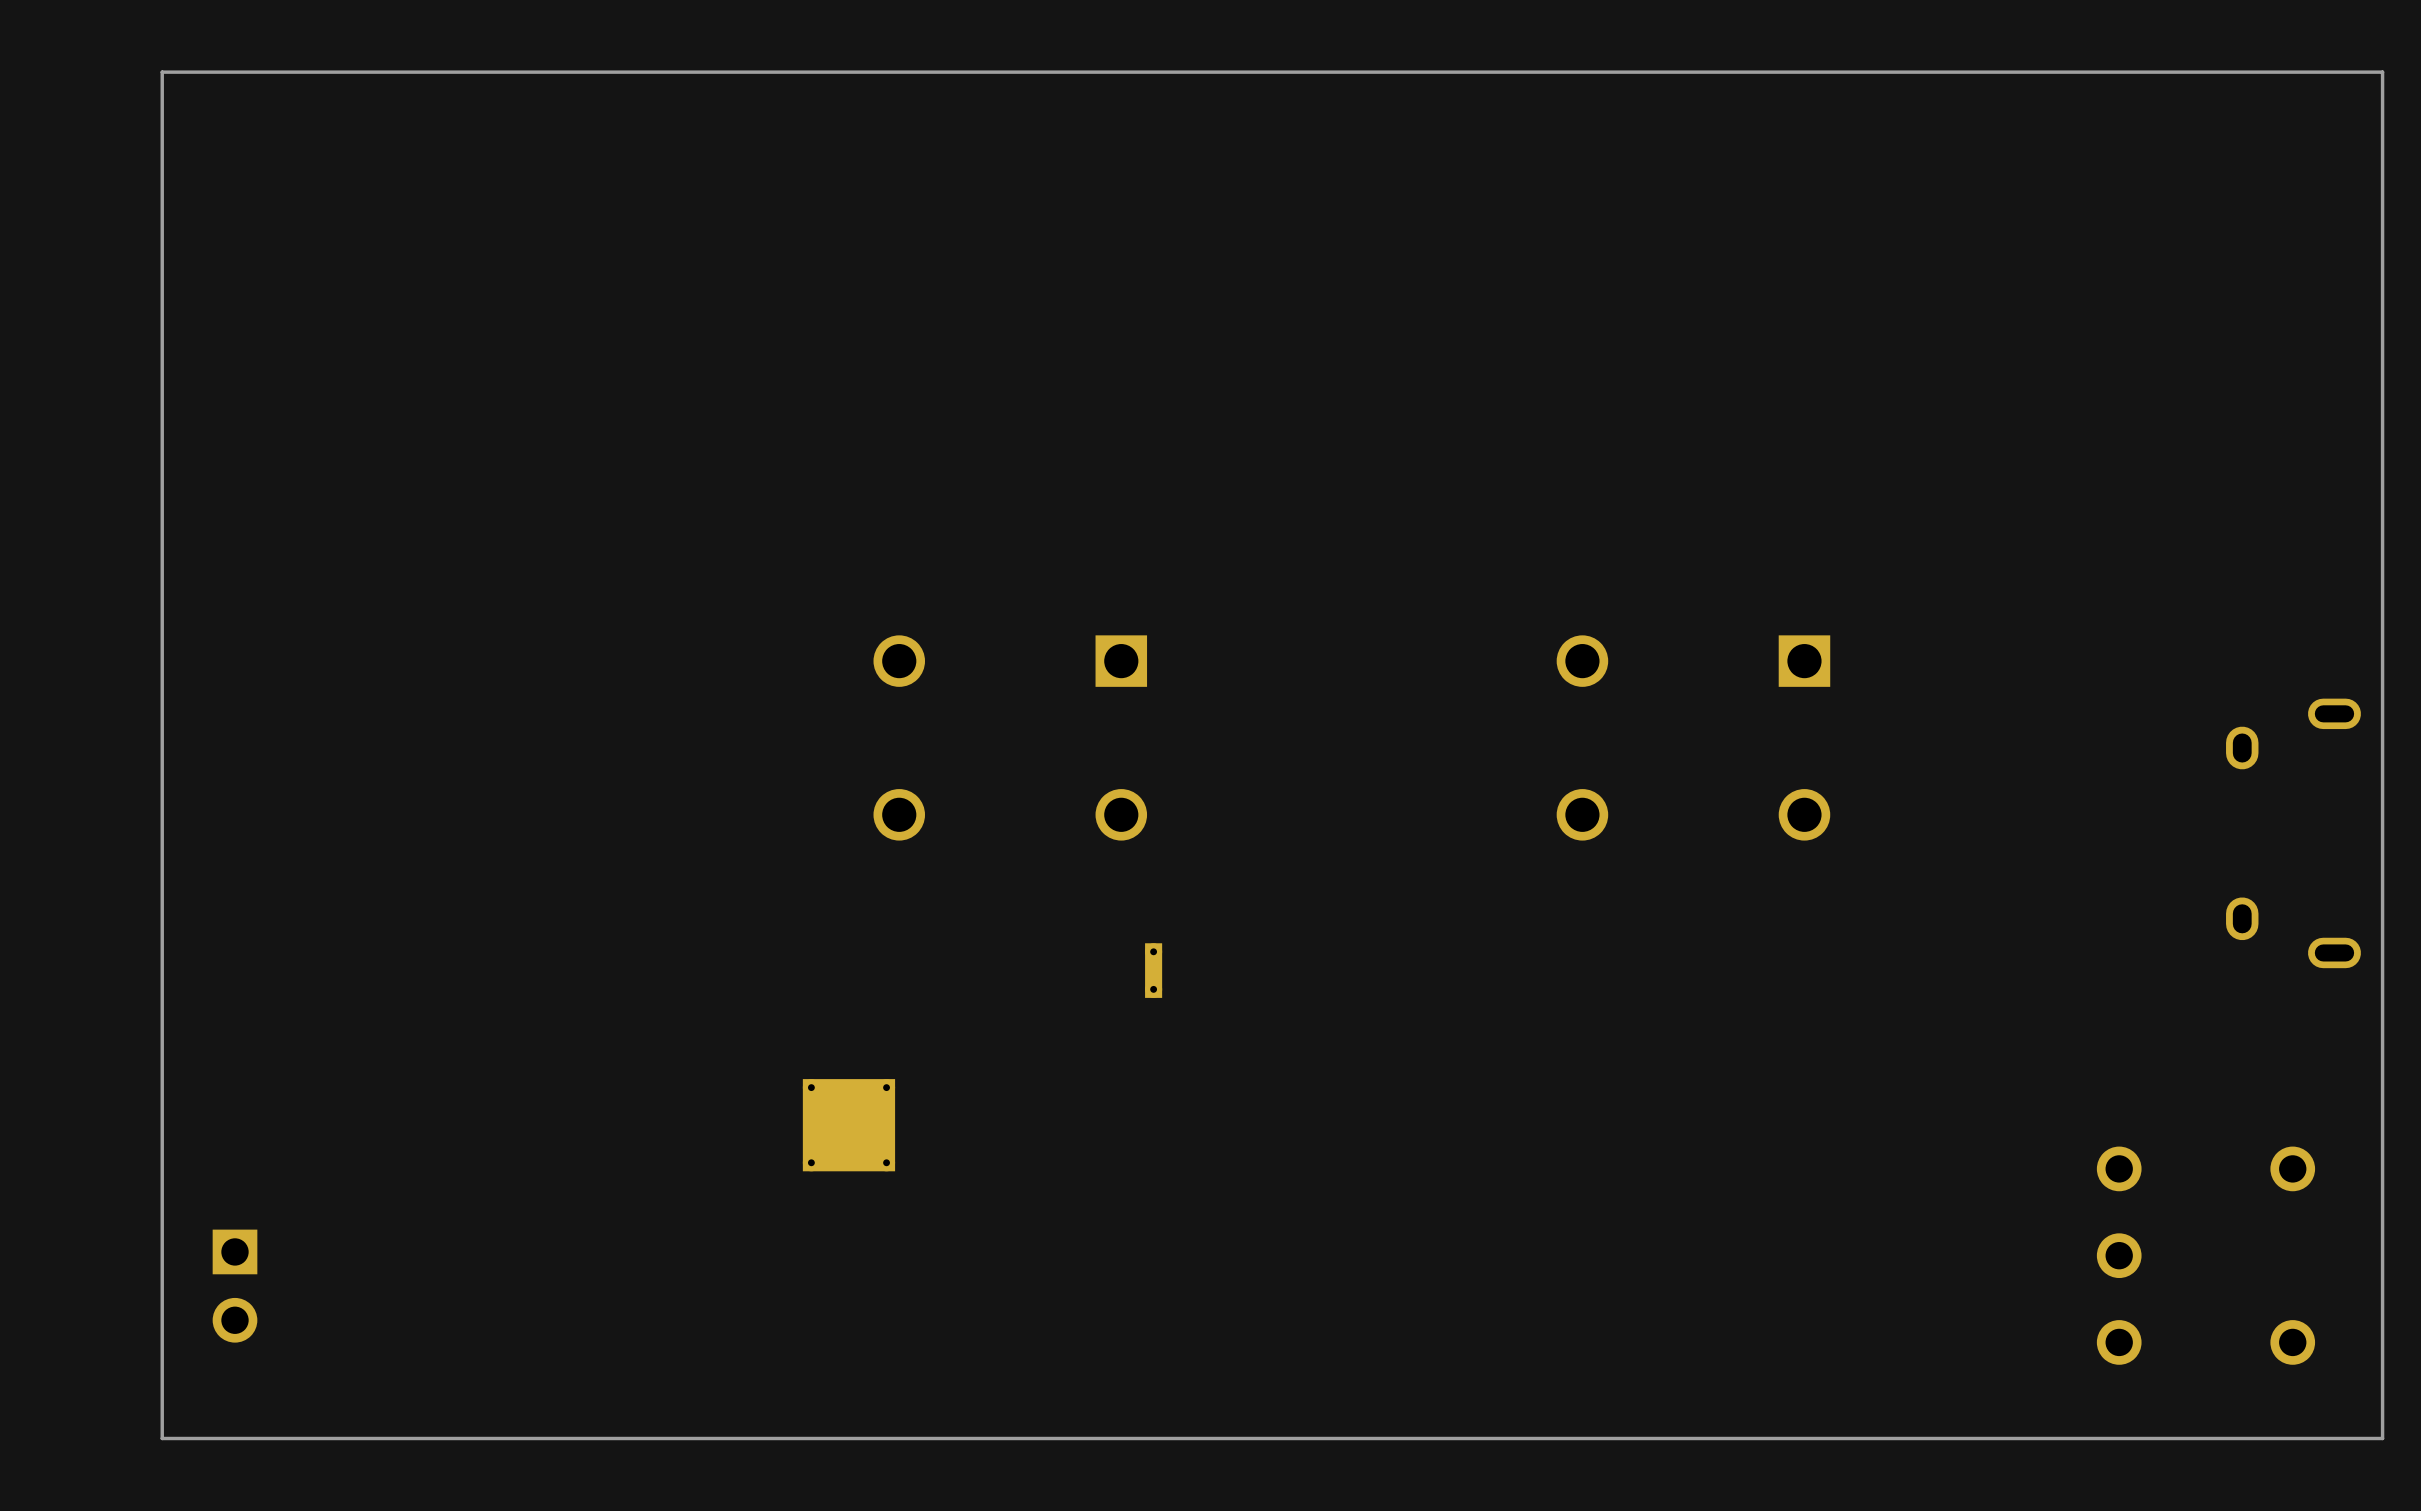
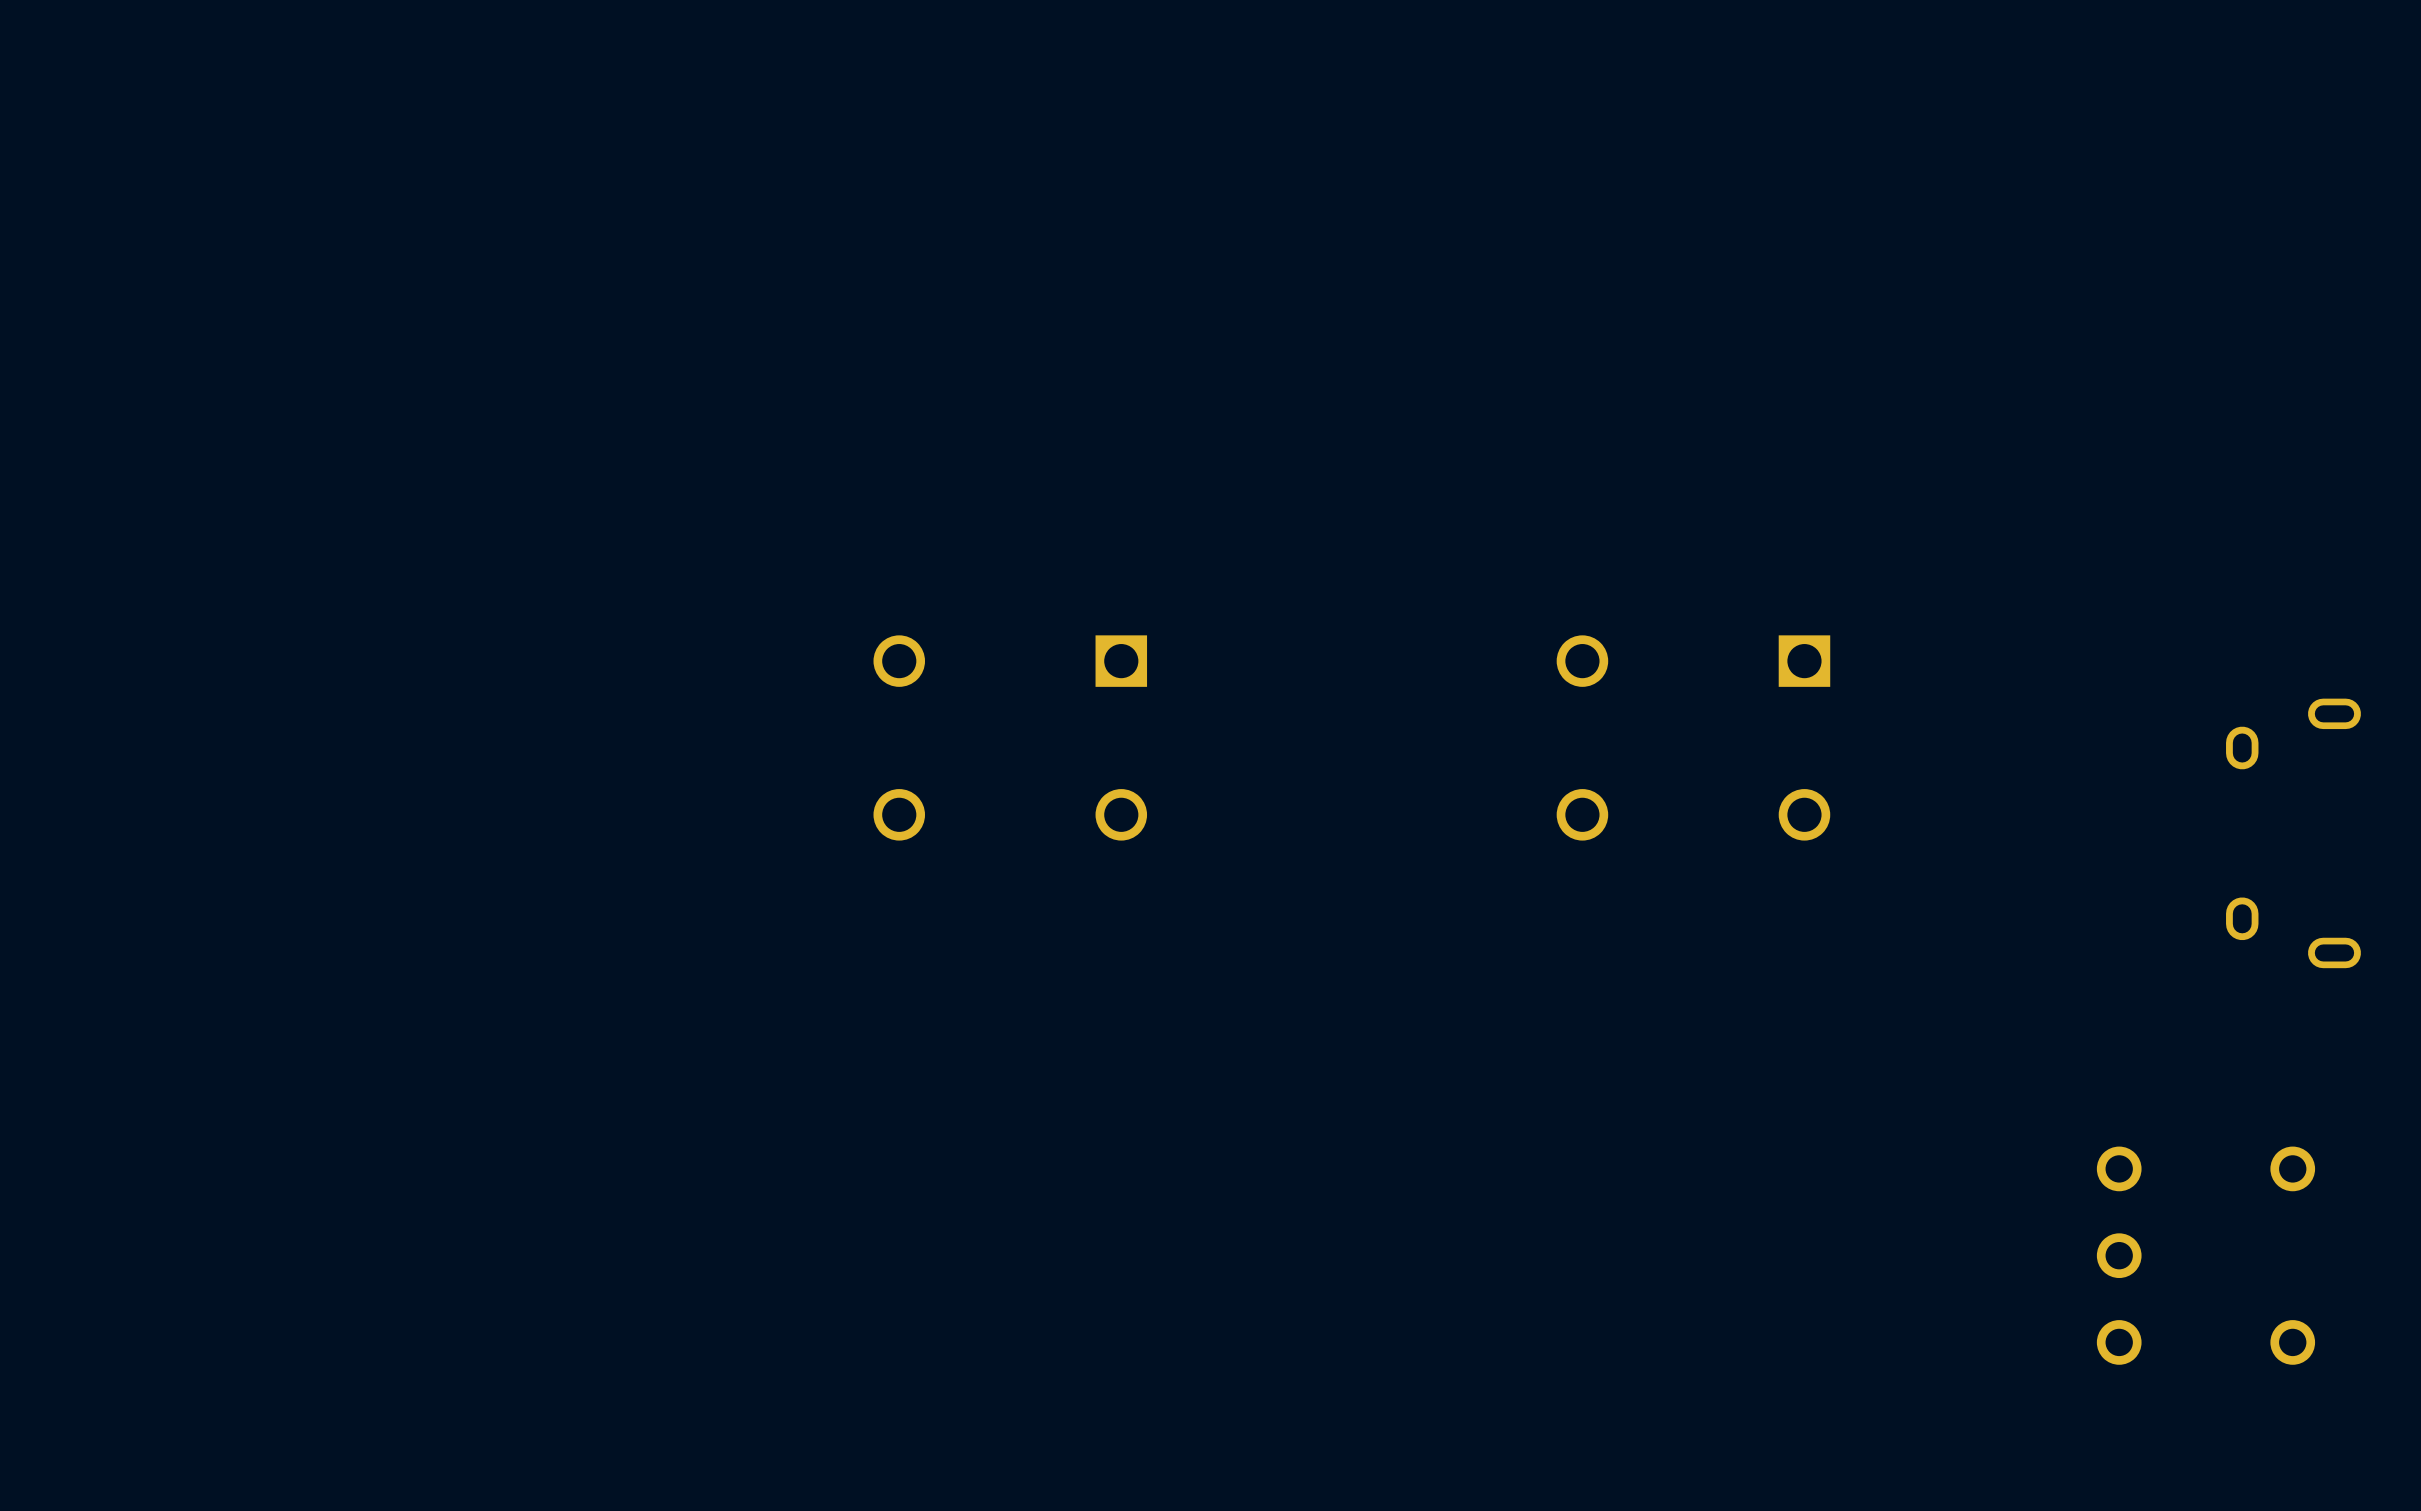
board edge: (2382, 72) (162, 72) (162, 1438) (2382, 1438) (2382, 72) -> none
part: (1153, 970) -> none
part: (848, 1125) -> none
part: (235, 1286) -> none

